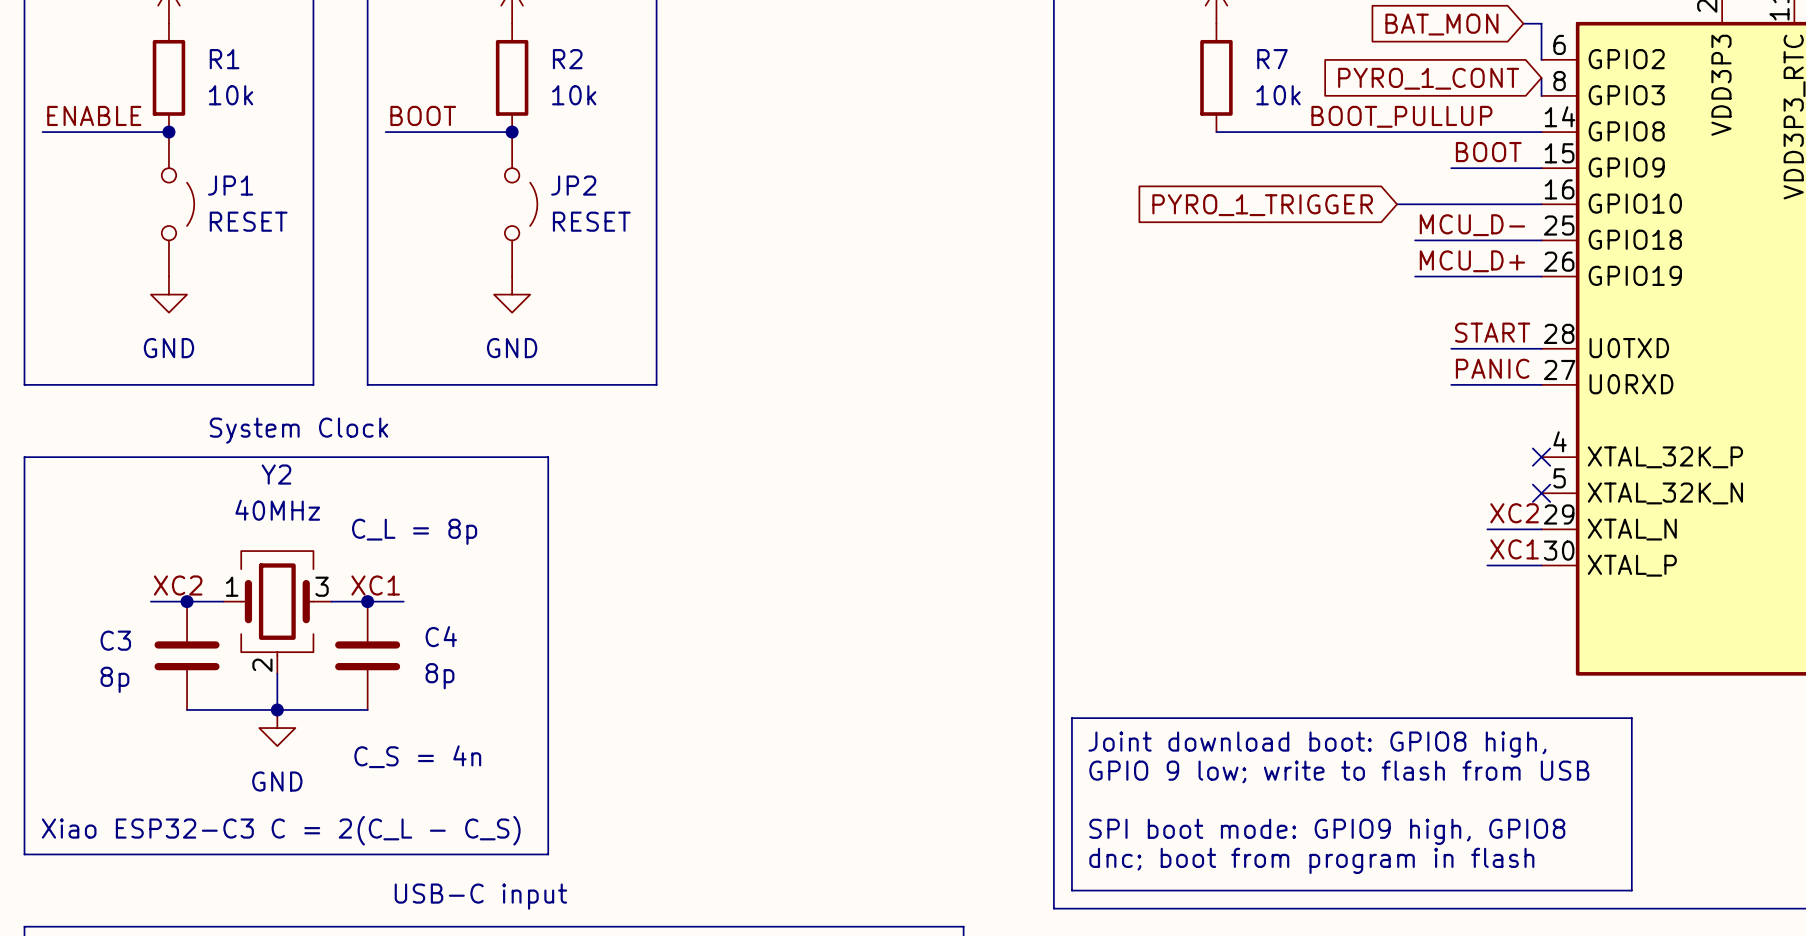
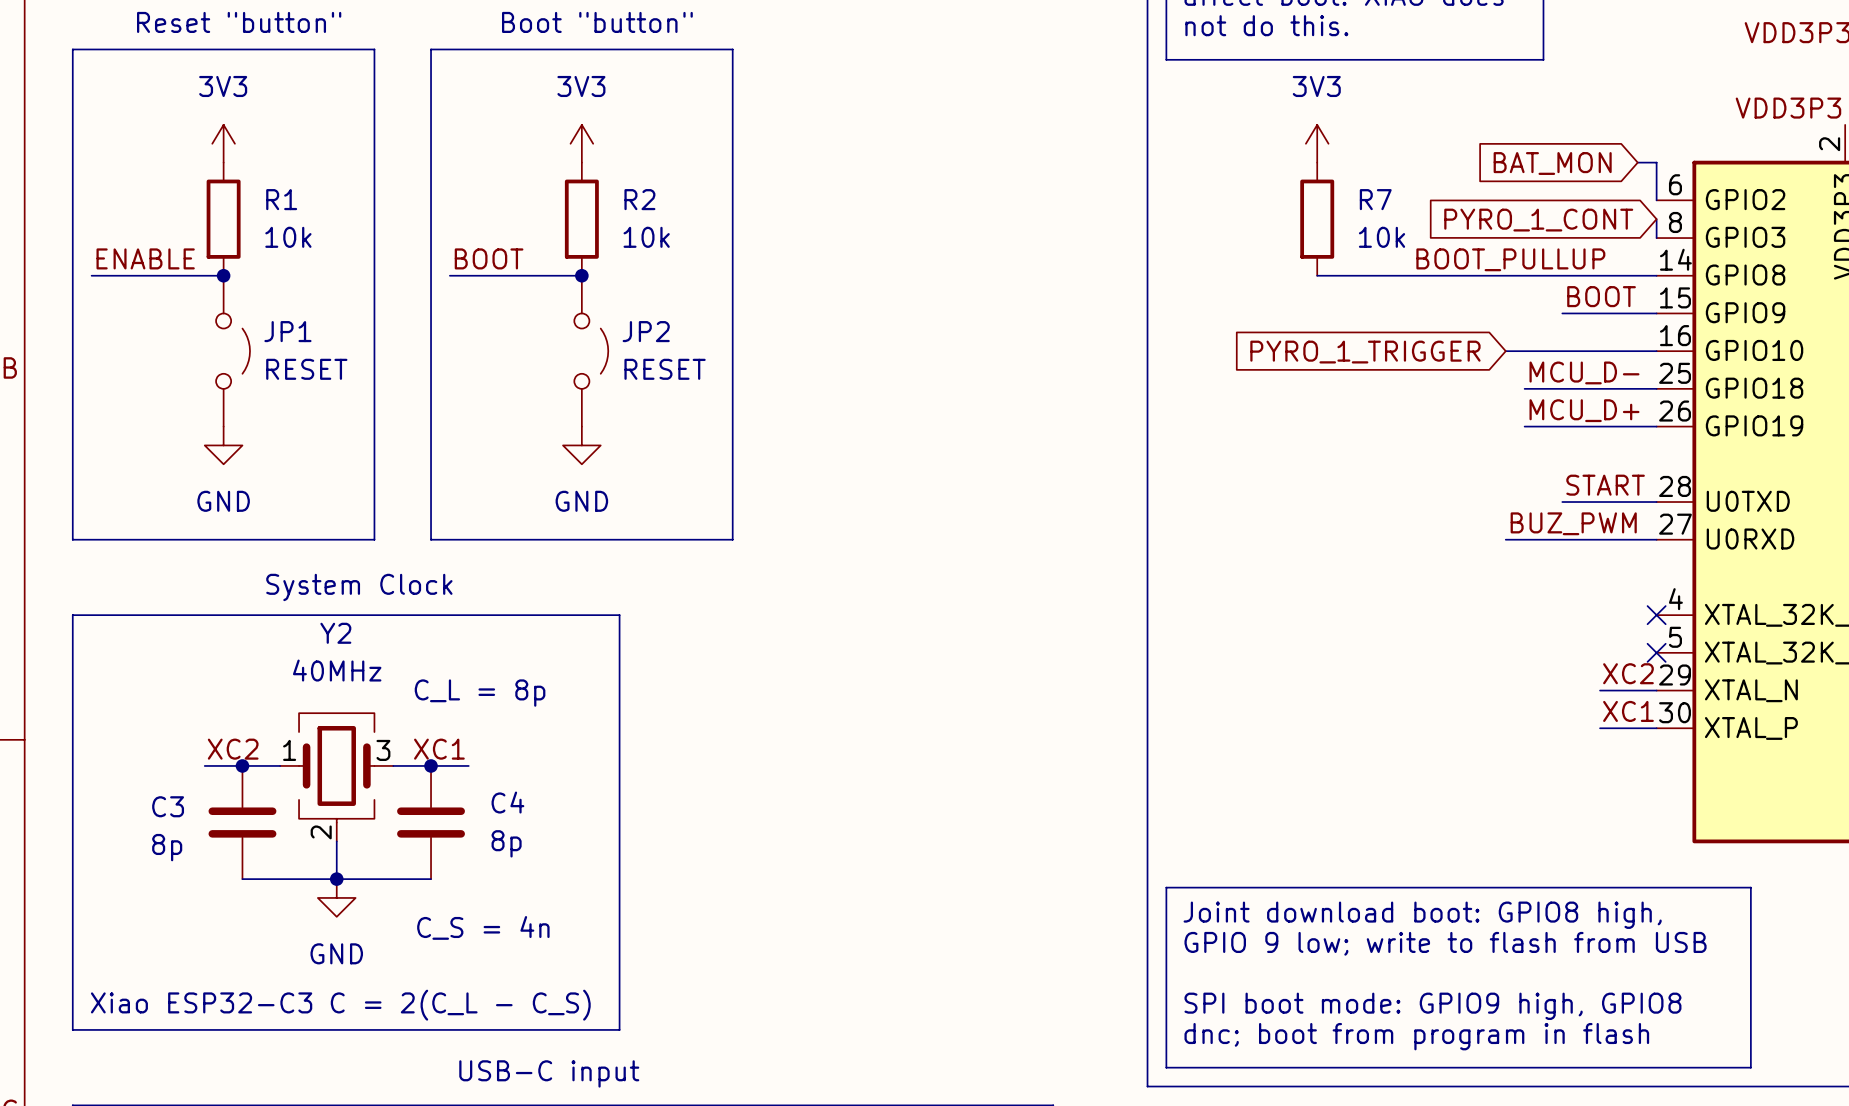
label: PANIC (1492, 368) -> none
label: none -> BUZ_PWM (1573, 523)
wire: none -> (1505, 539) (1562, 539)

